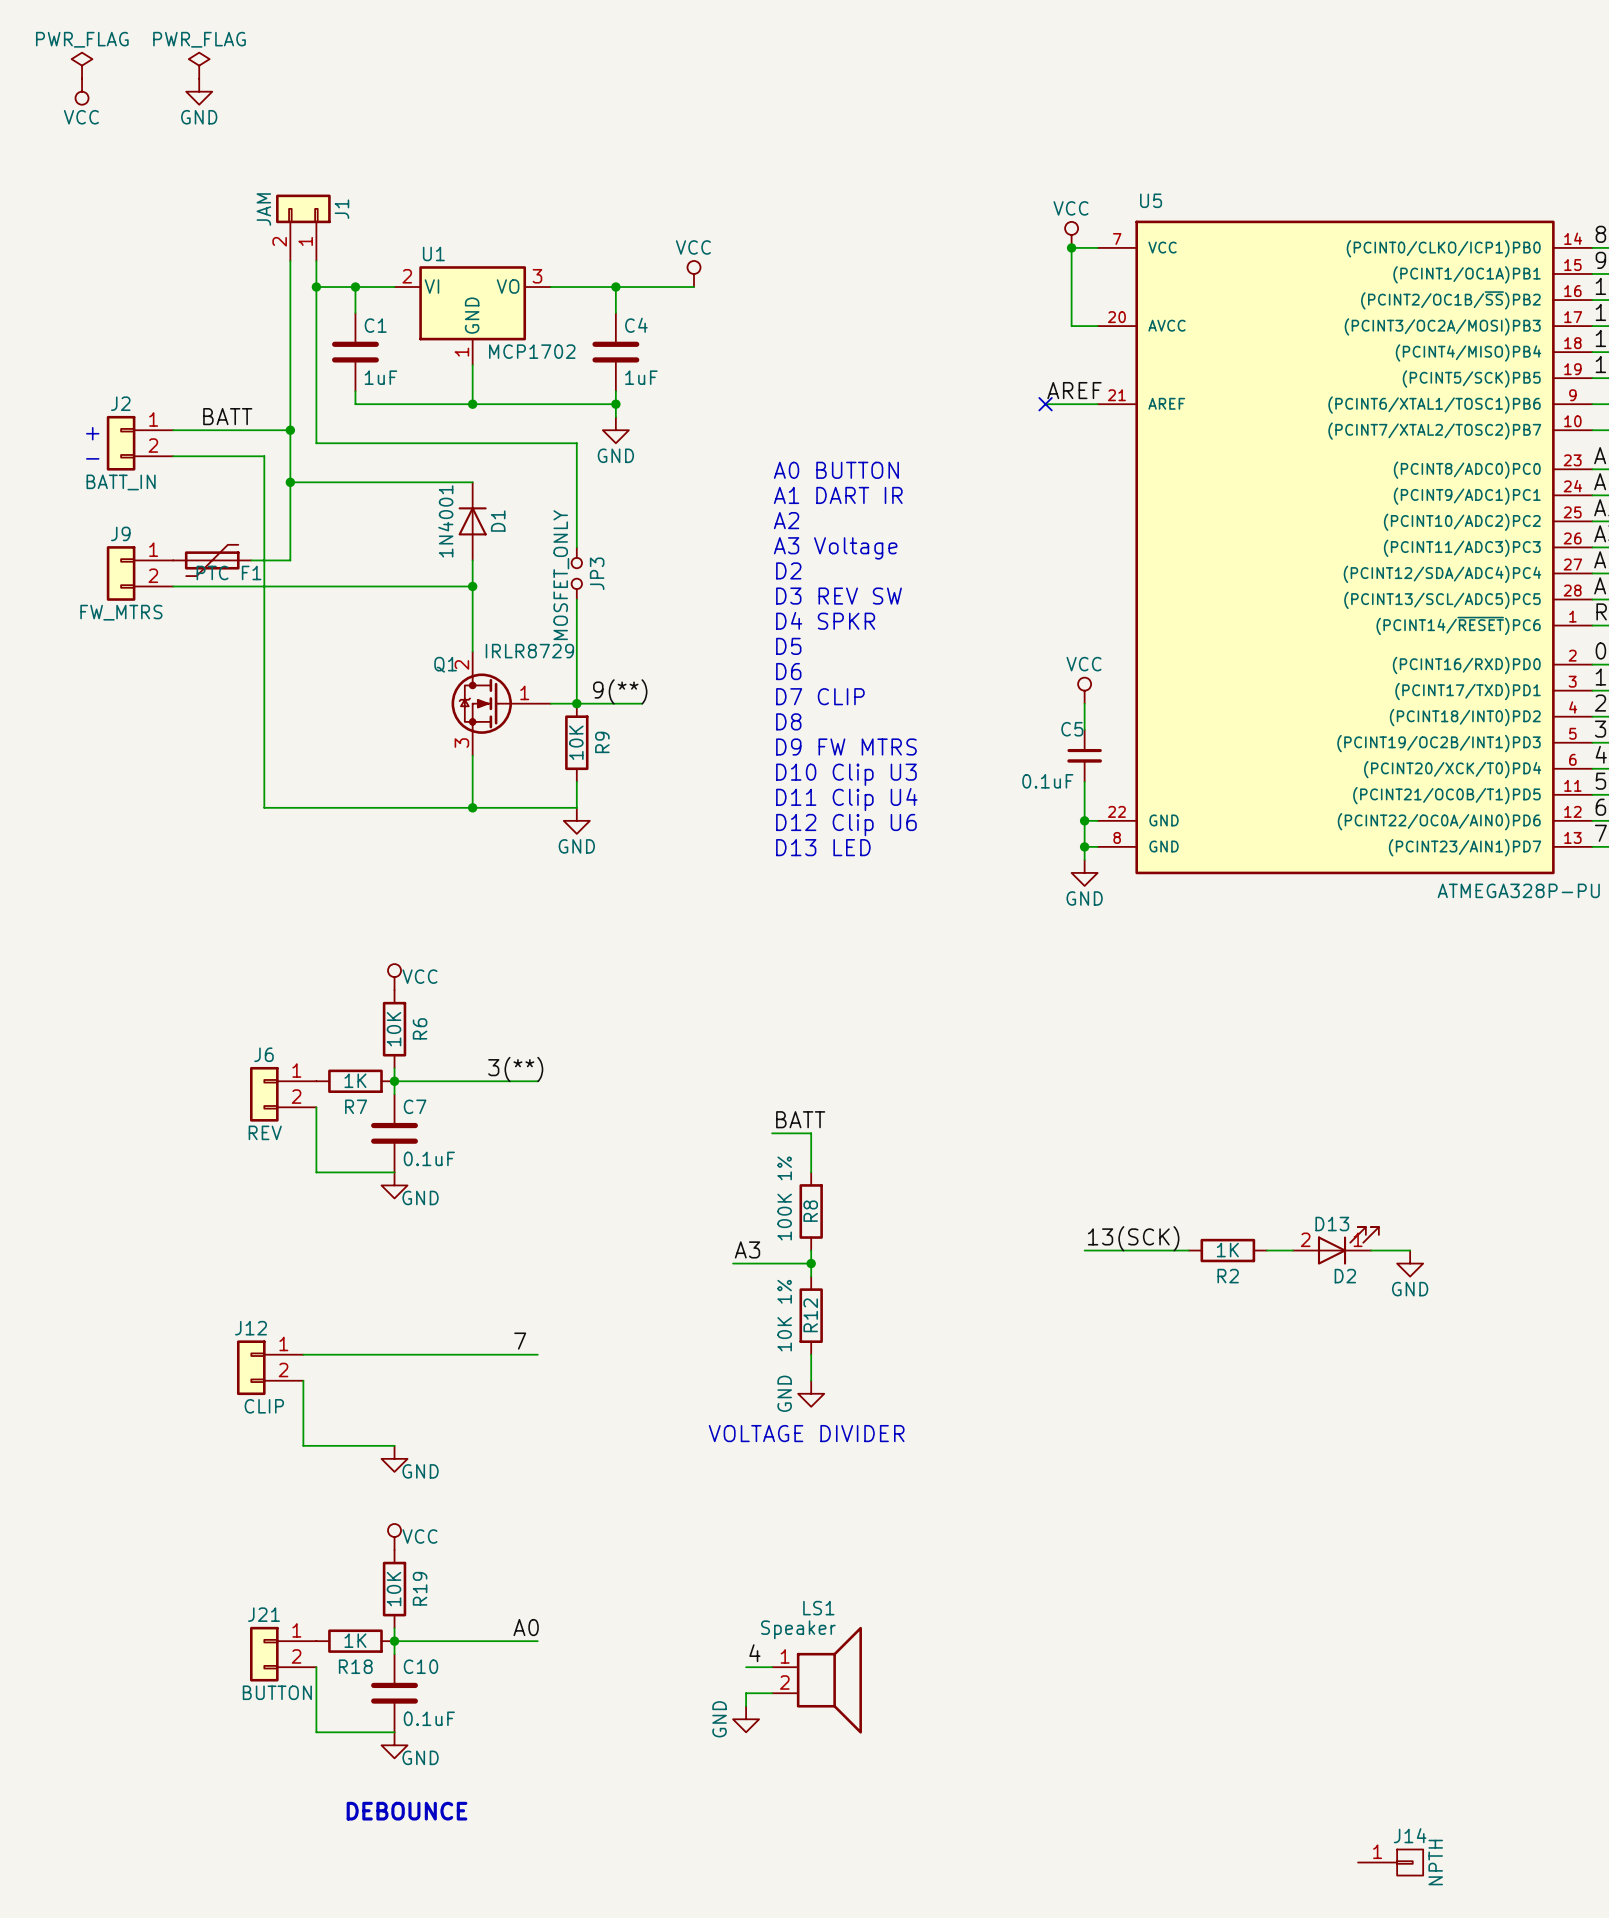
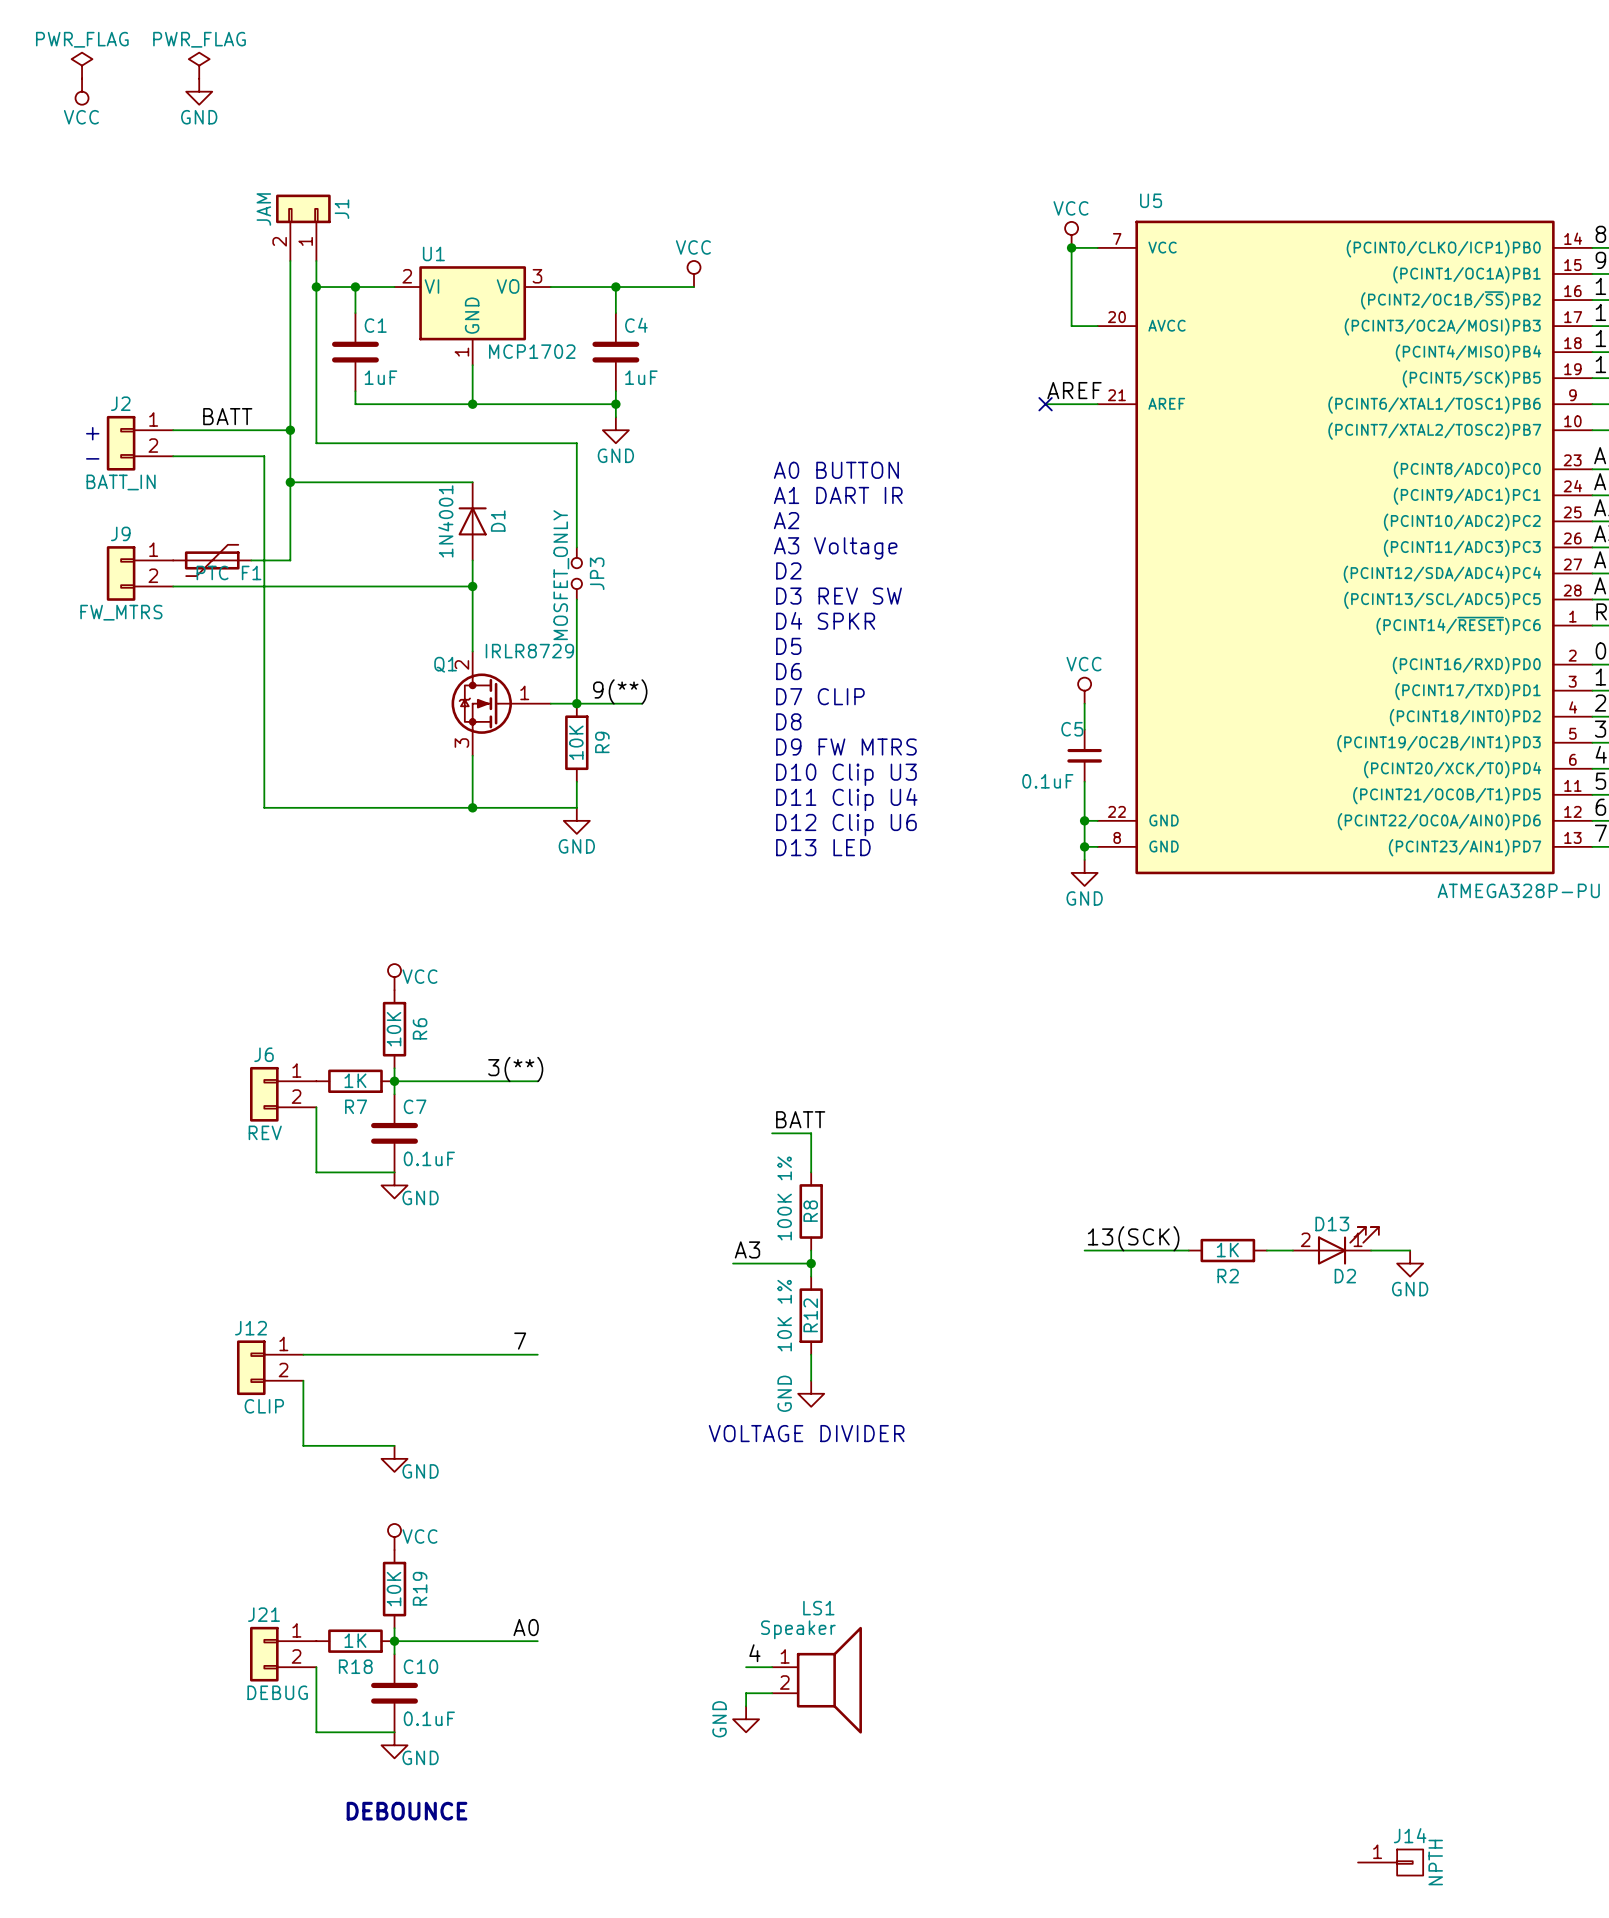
J21 value: BUTTON (277, 1692) -> DEBUG (277, 1692)

